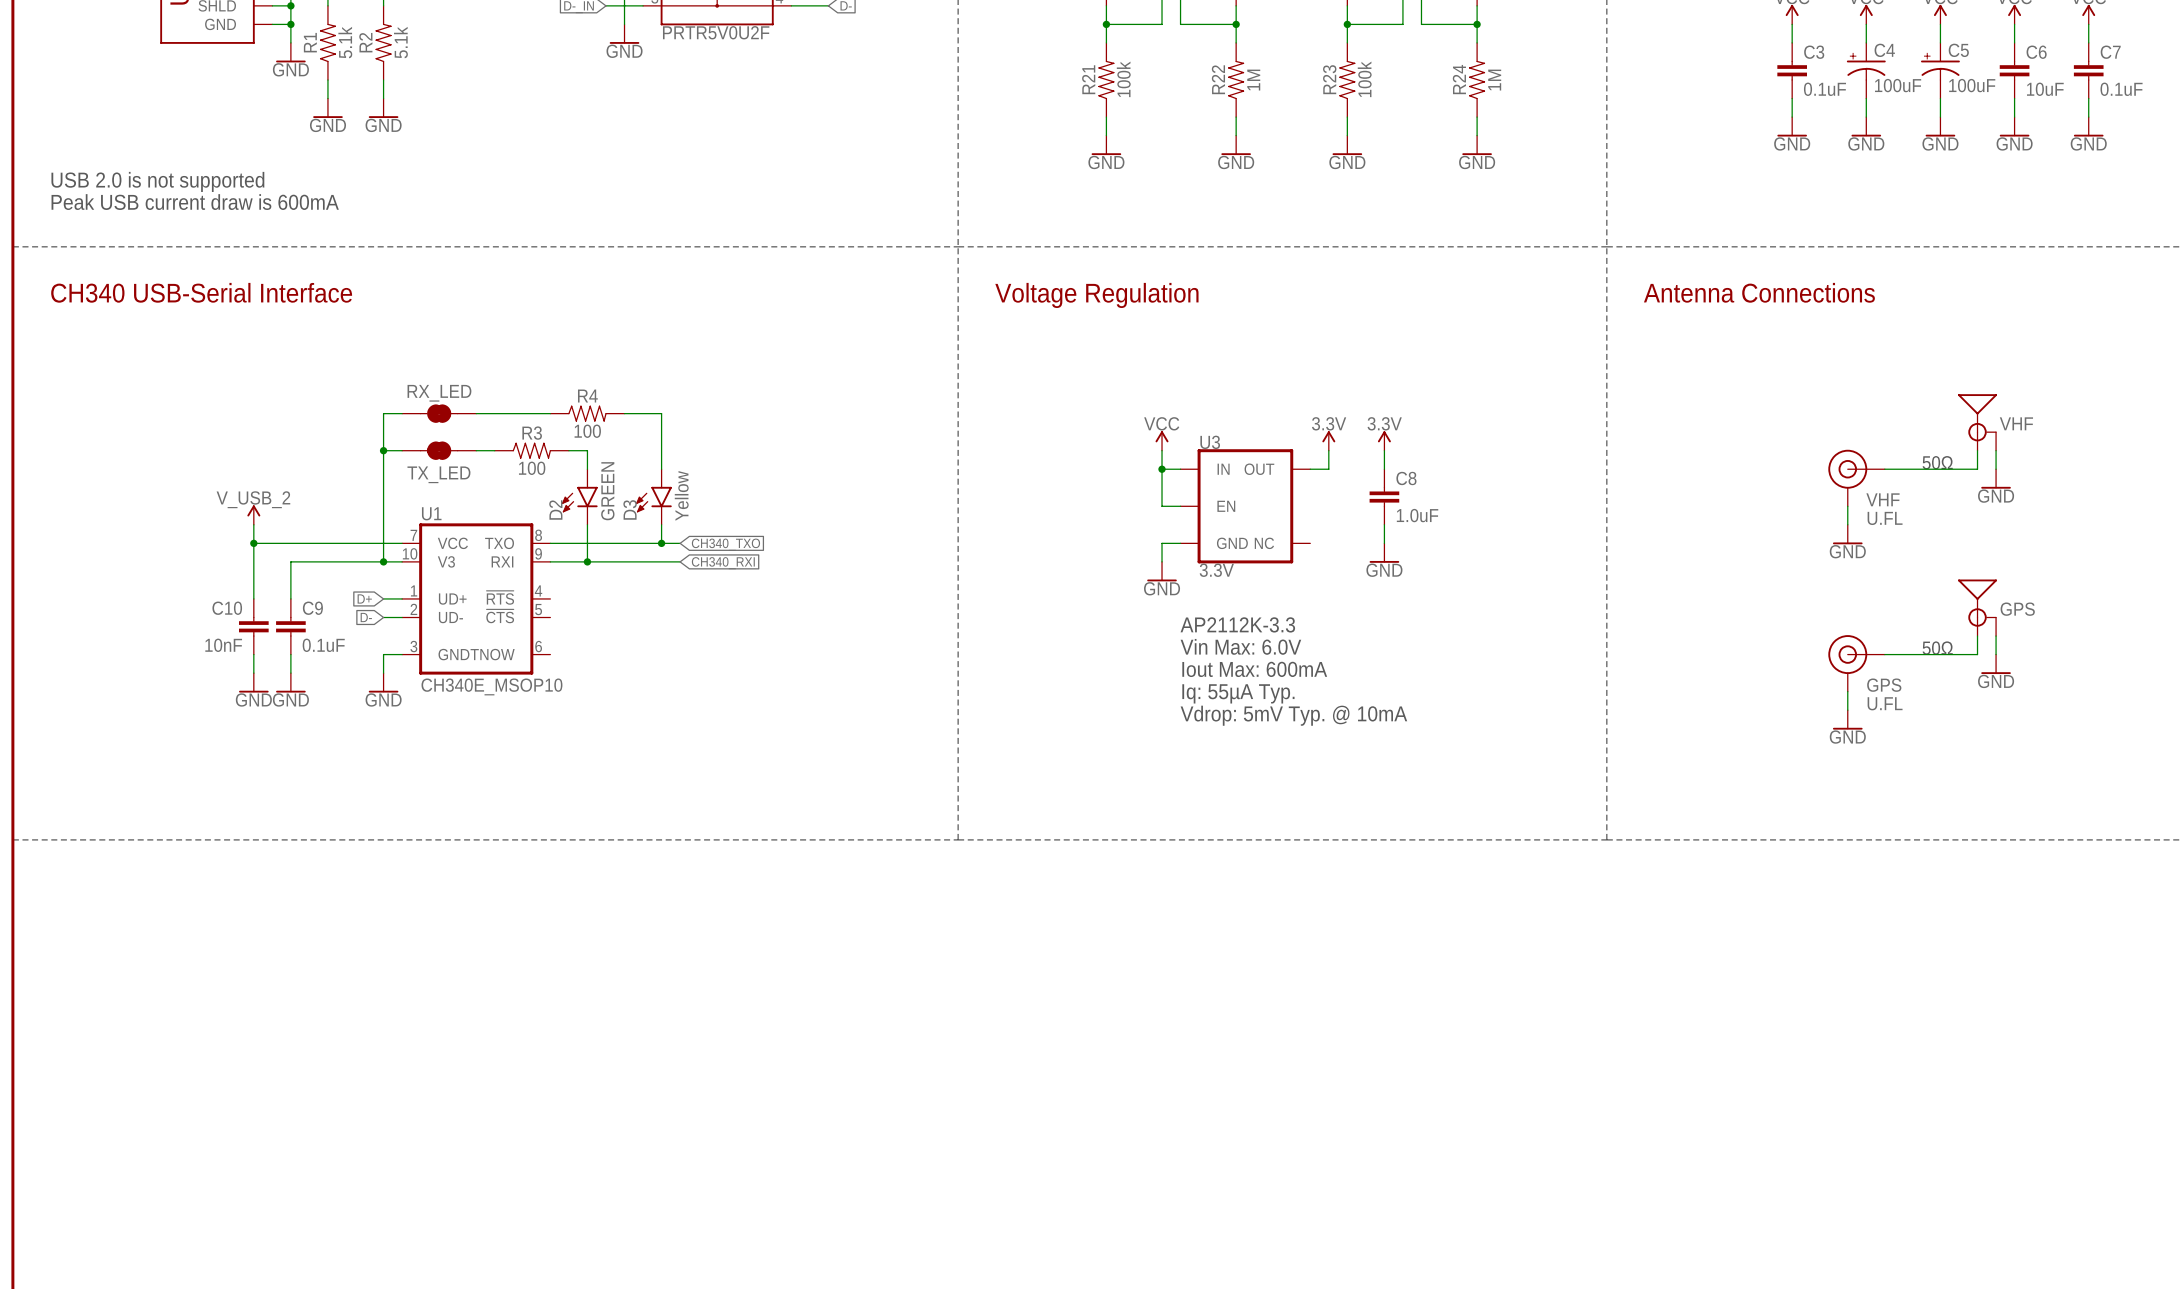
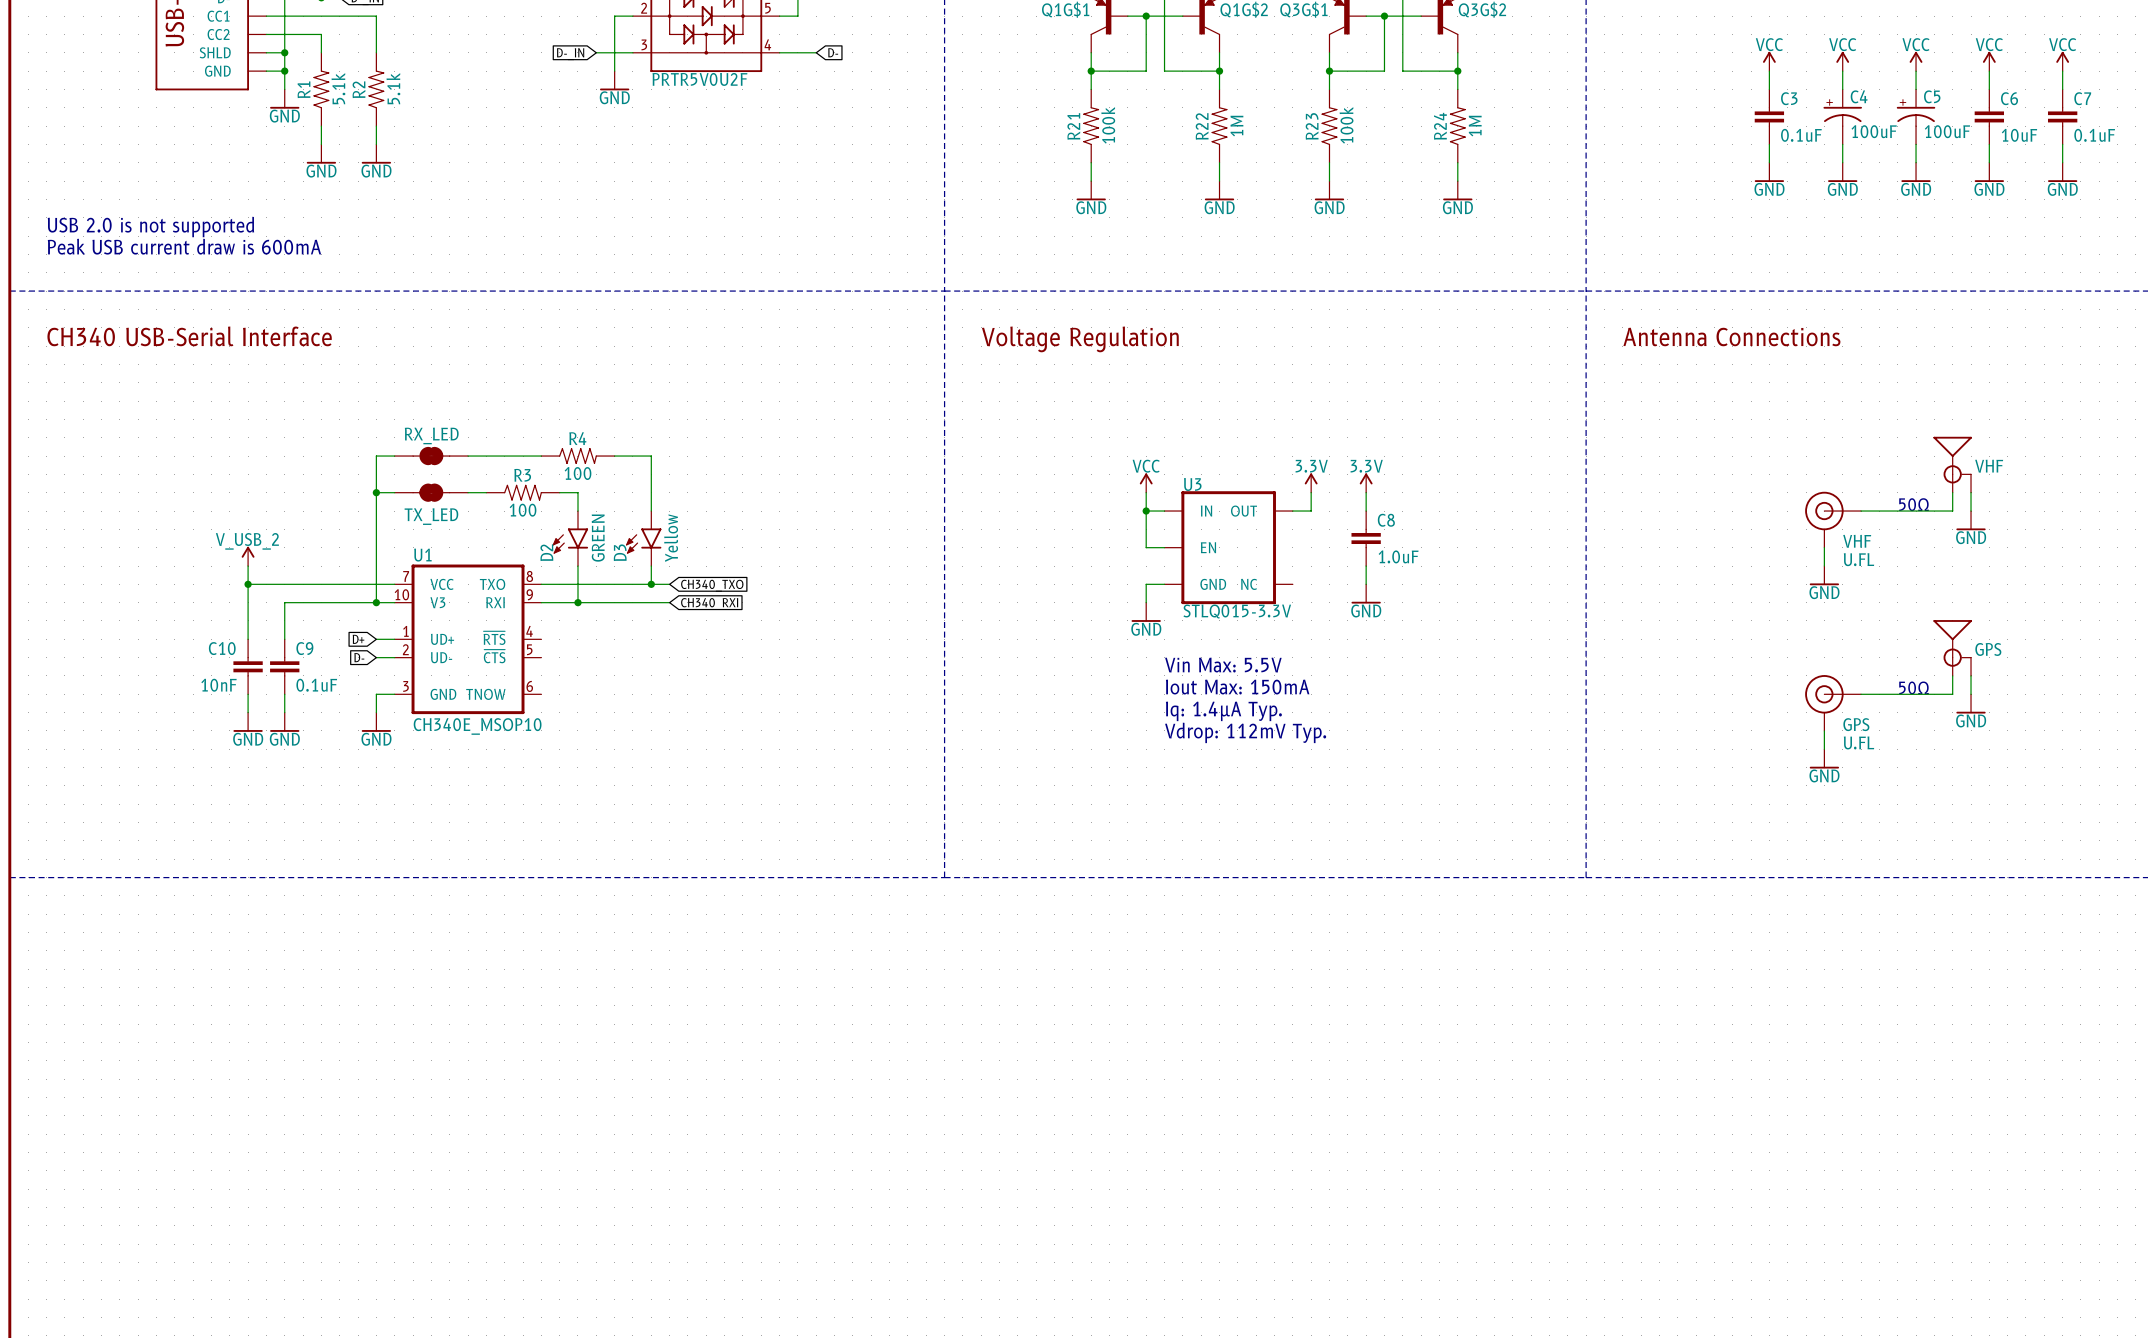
U3 value: 3.3V (1216, 570) -> STLQ015-3.3V (1237, 611)
text: AP2112K-3.3 (1237, 624) -> Vin Max: 5.5V (1223, 665)
text: Vin Max: 6.0V (1240, 646) -> Iout Max: 150mA (1237, 687)
text: Iout Max: 600mA (1254, 669) -> Iq: 1.4µA Typ. (1223, 711)
text: Iq: 55µA Typ. (1238, 693) -> Vdrop: 112mV Typ. (1245, 732)
text: Vdrop: 5mV Typ. @ 10mA (1293, 715) -> none

